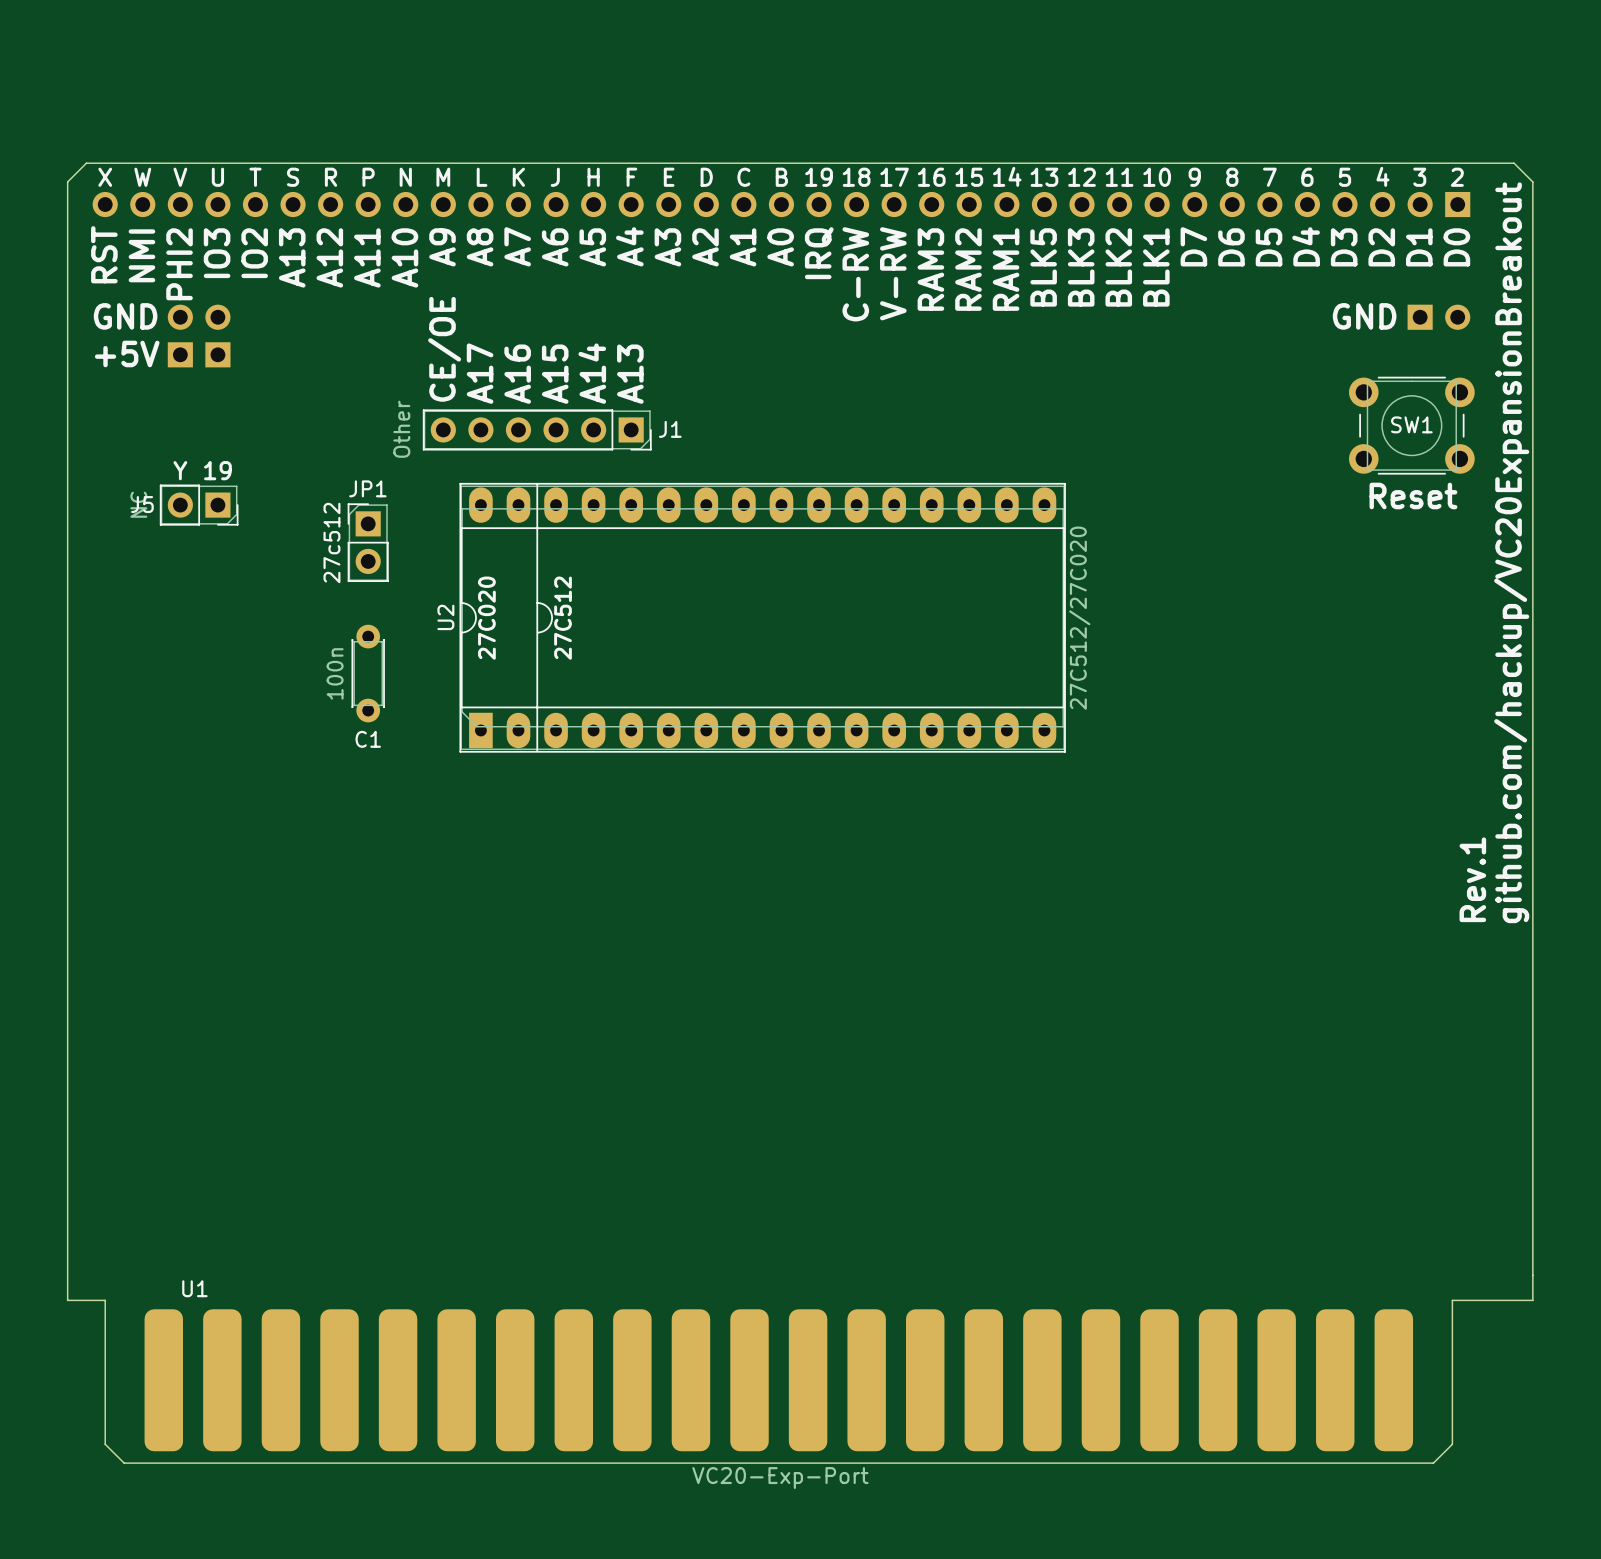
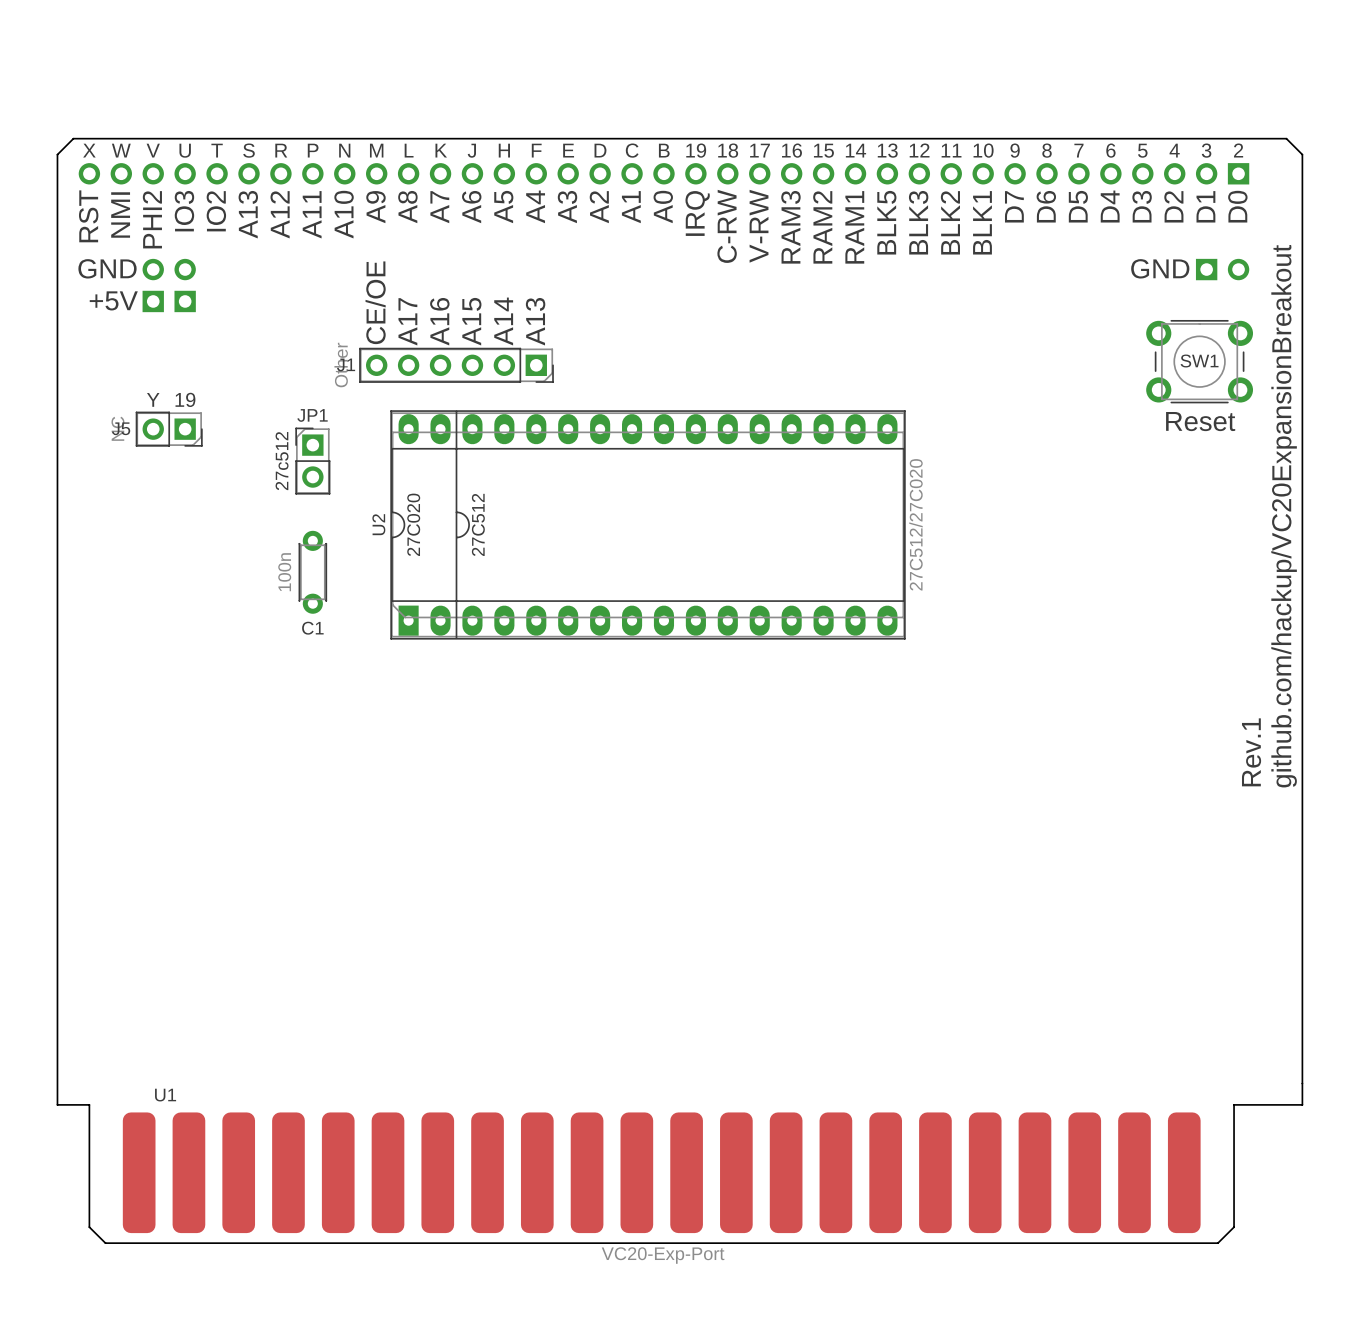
J1 name position: J1 (670, 429) -> J1 (346, 364)

